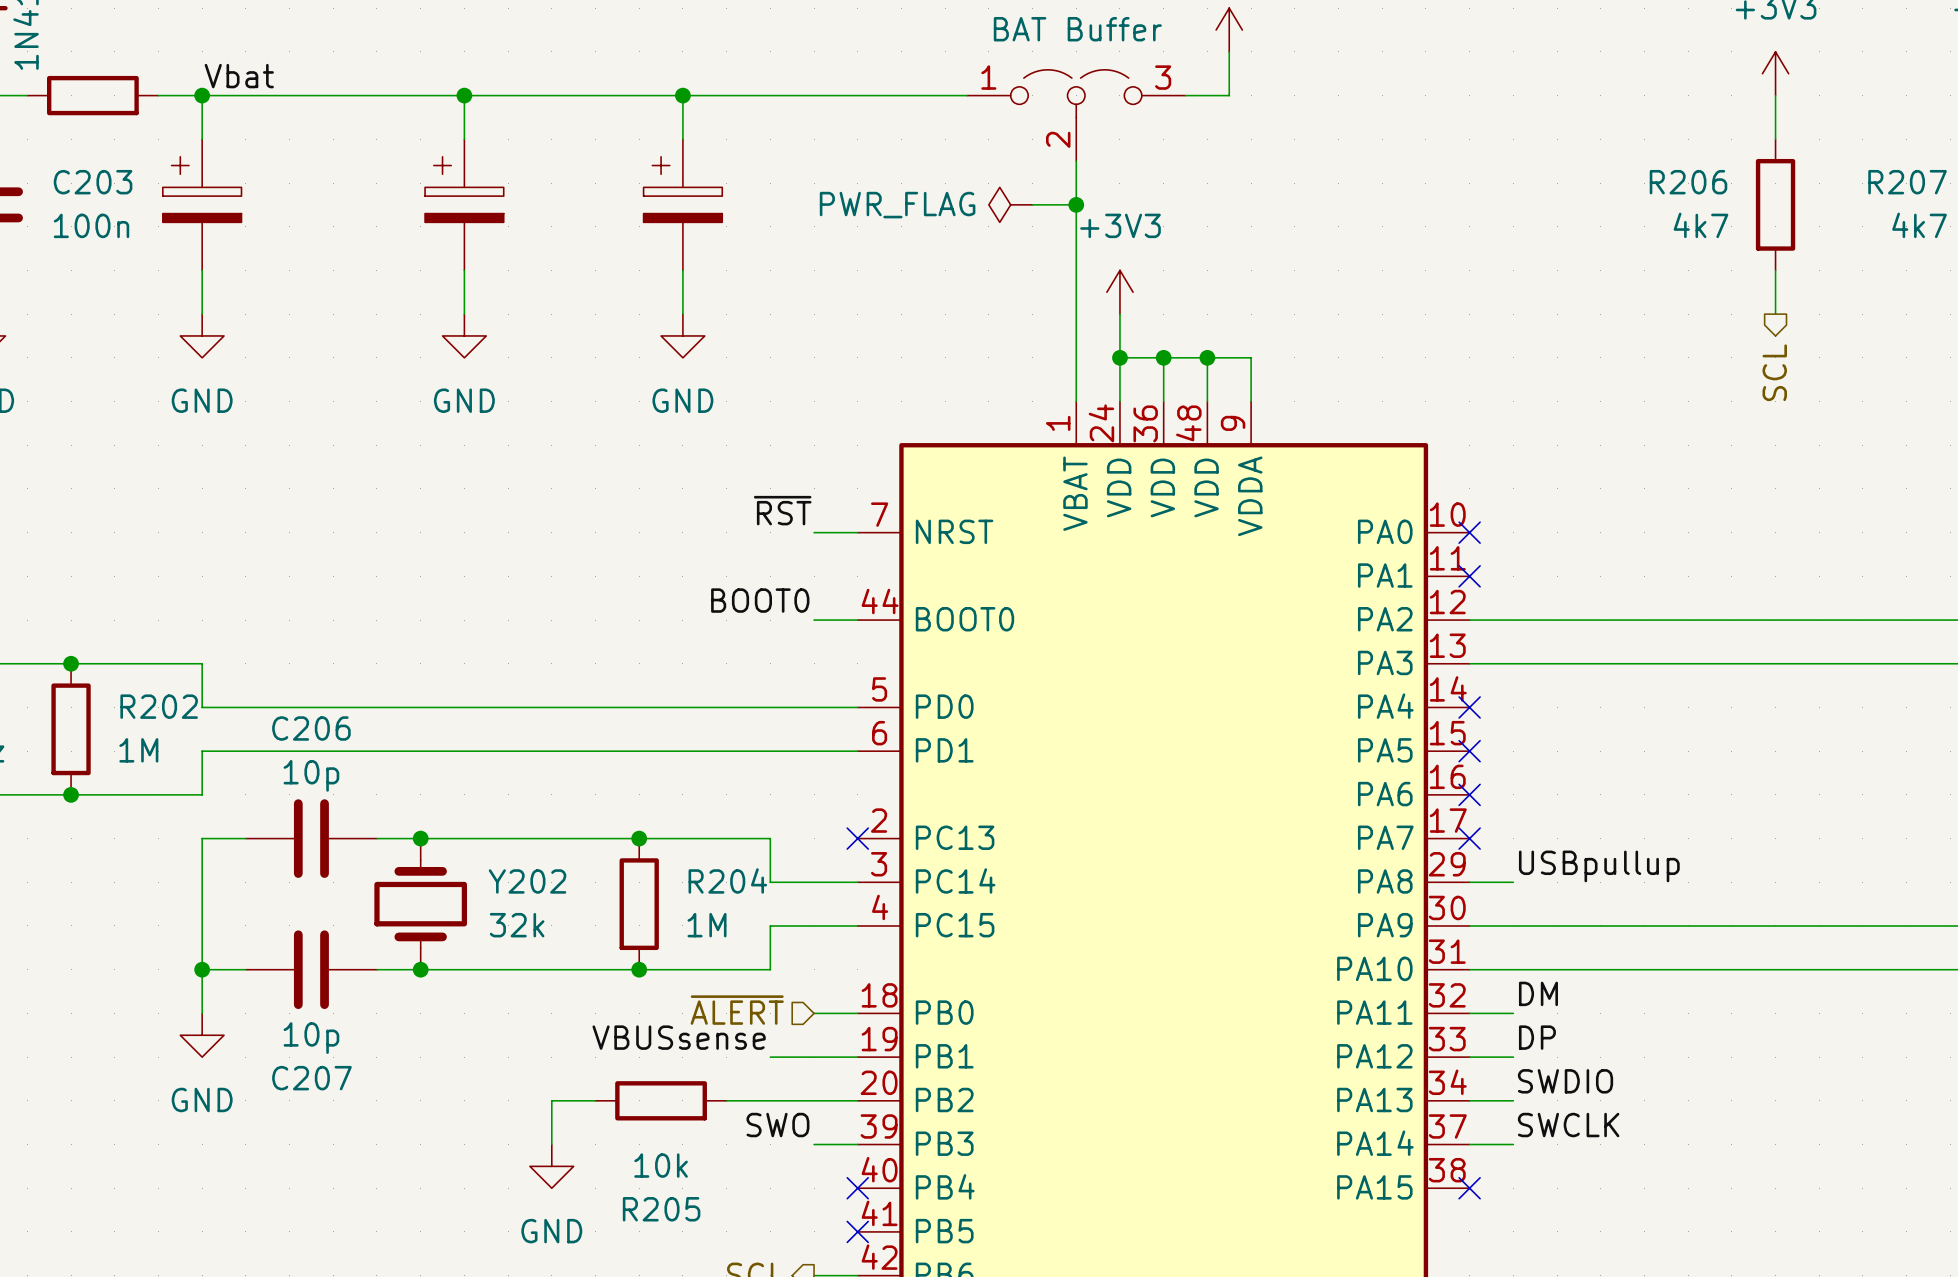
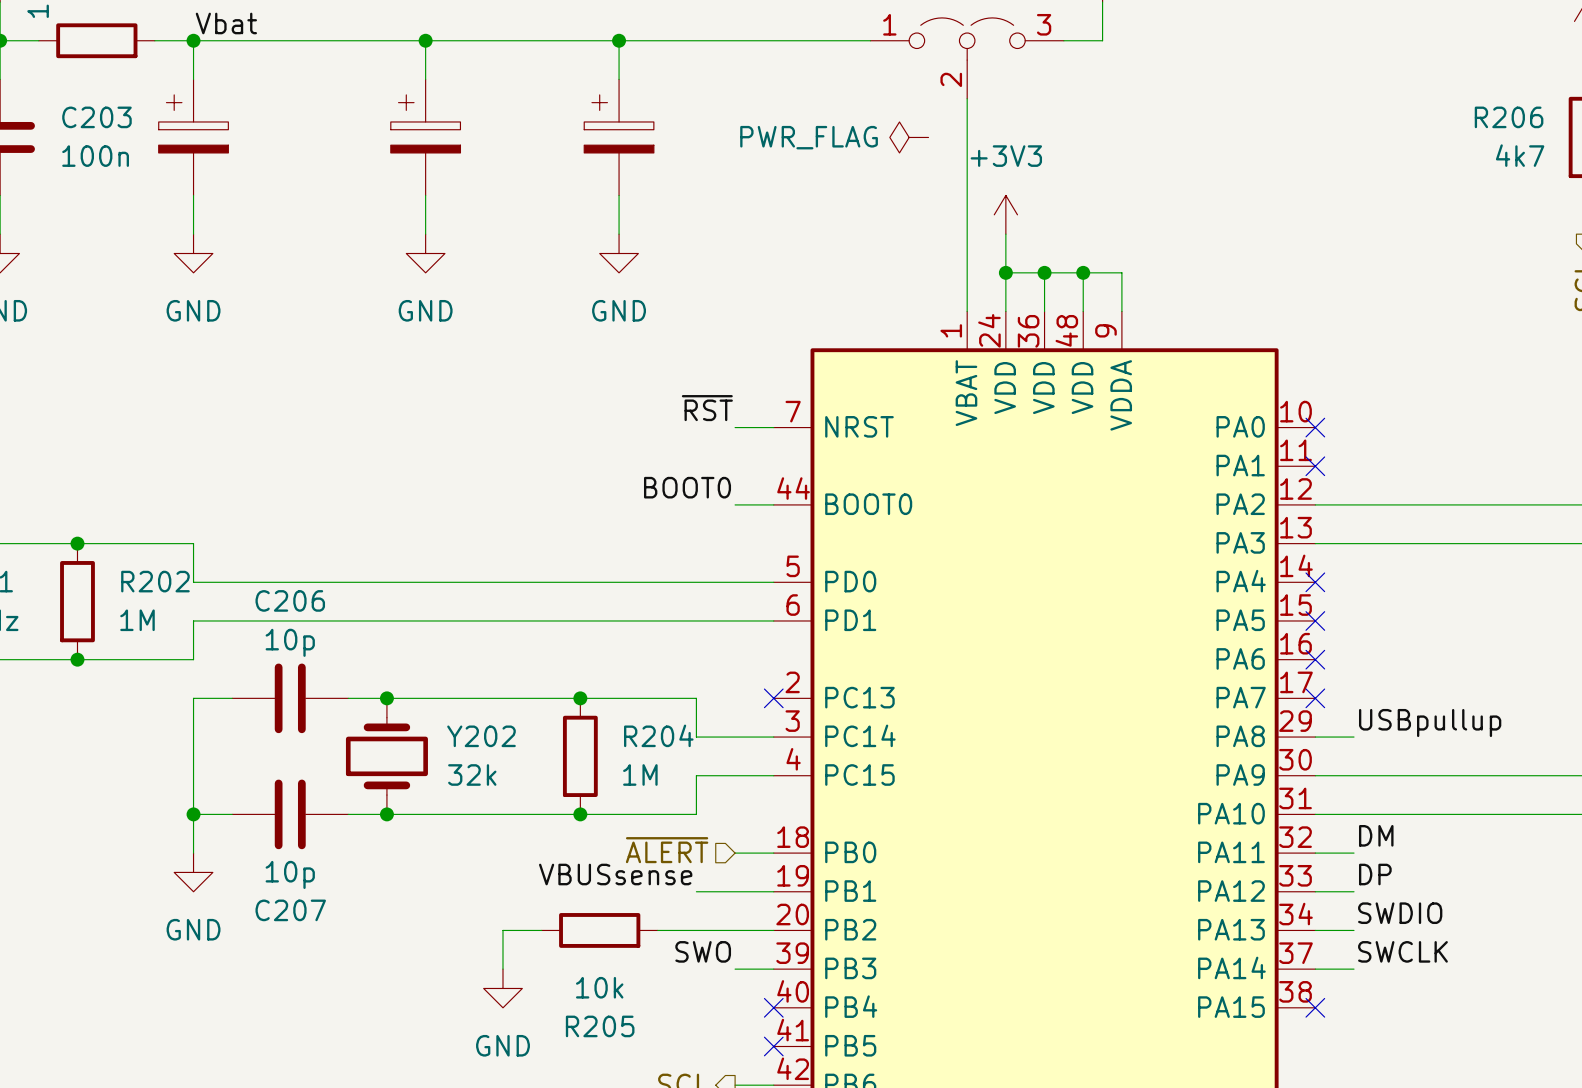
wire: (1032, 204) (1076, 204) -> none
junction: (1076, 204) -> none

